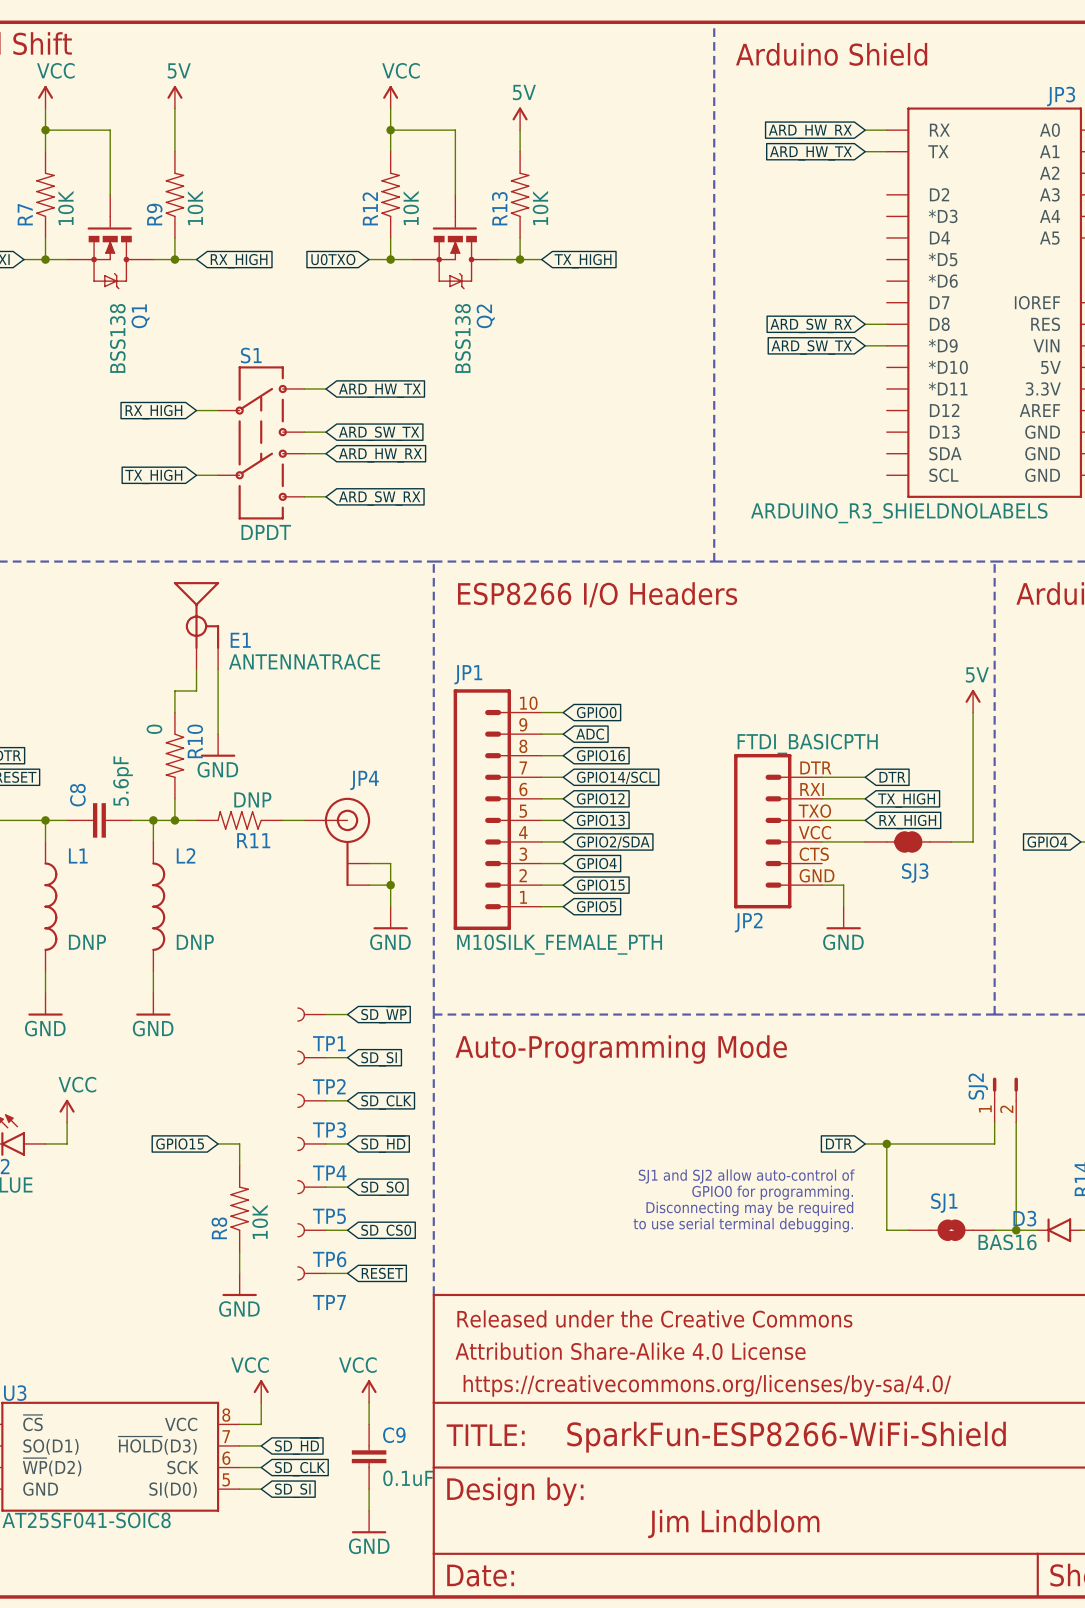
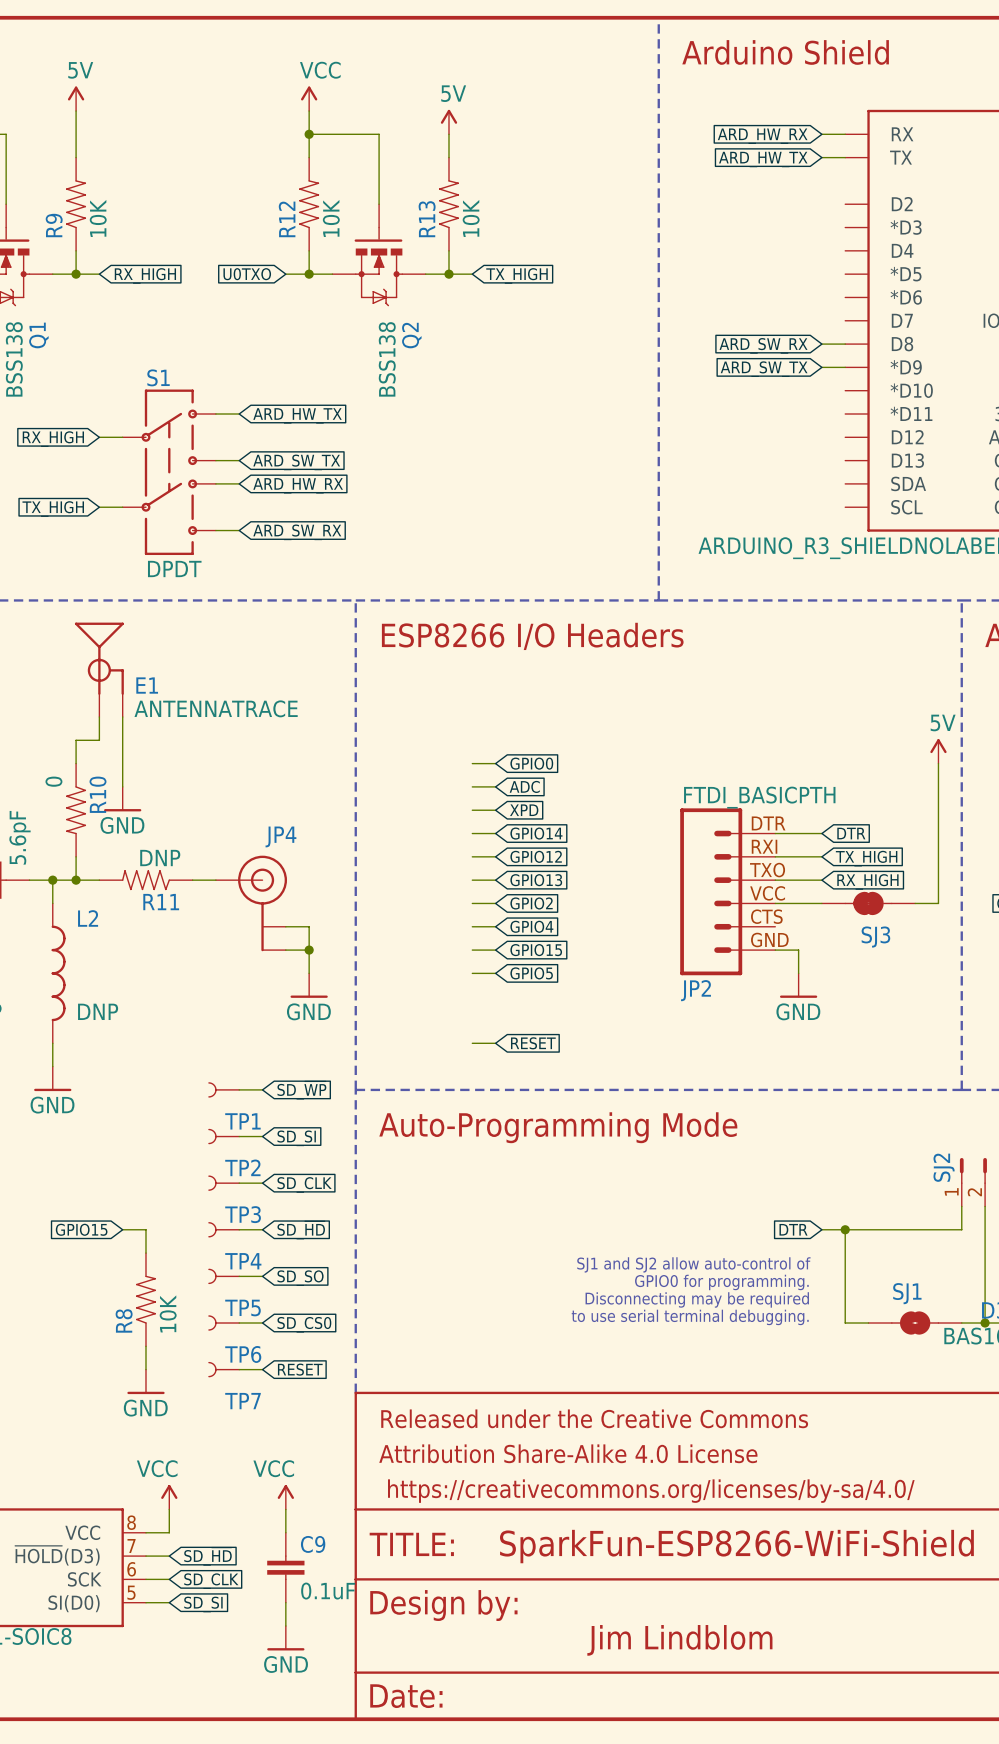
global label: GPIO16 (600, 755) -> XPD (524, 810)
global label: GPIO14/SCL (616, 777) -> GPIO14 (536, 833)
JP1: M10SILK_FEMALE_PTH (497, 809) -> none
global label: GPIO2/SDA (613, 842) -> GPIO2 (531, 903)
wire: none -> (472, 1043) (495, 1043)
global label: none -> RESET (533, 1043)

